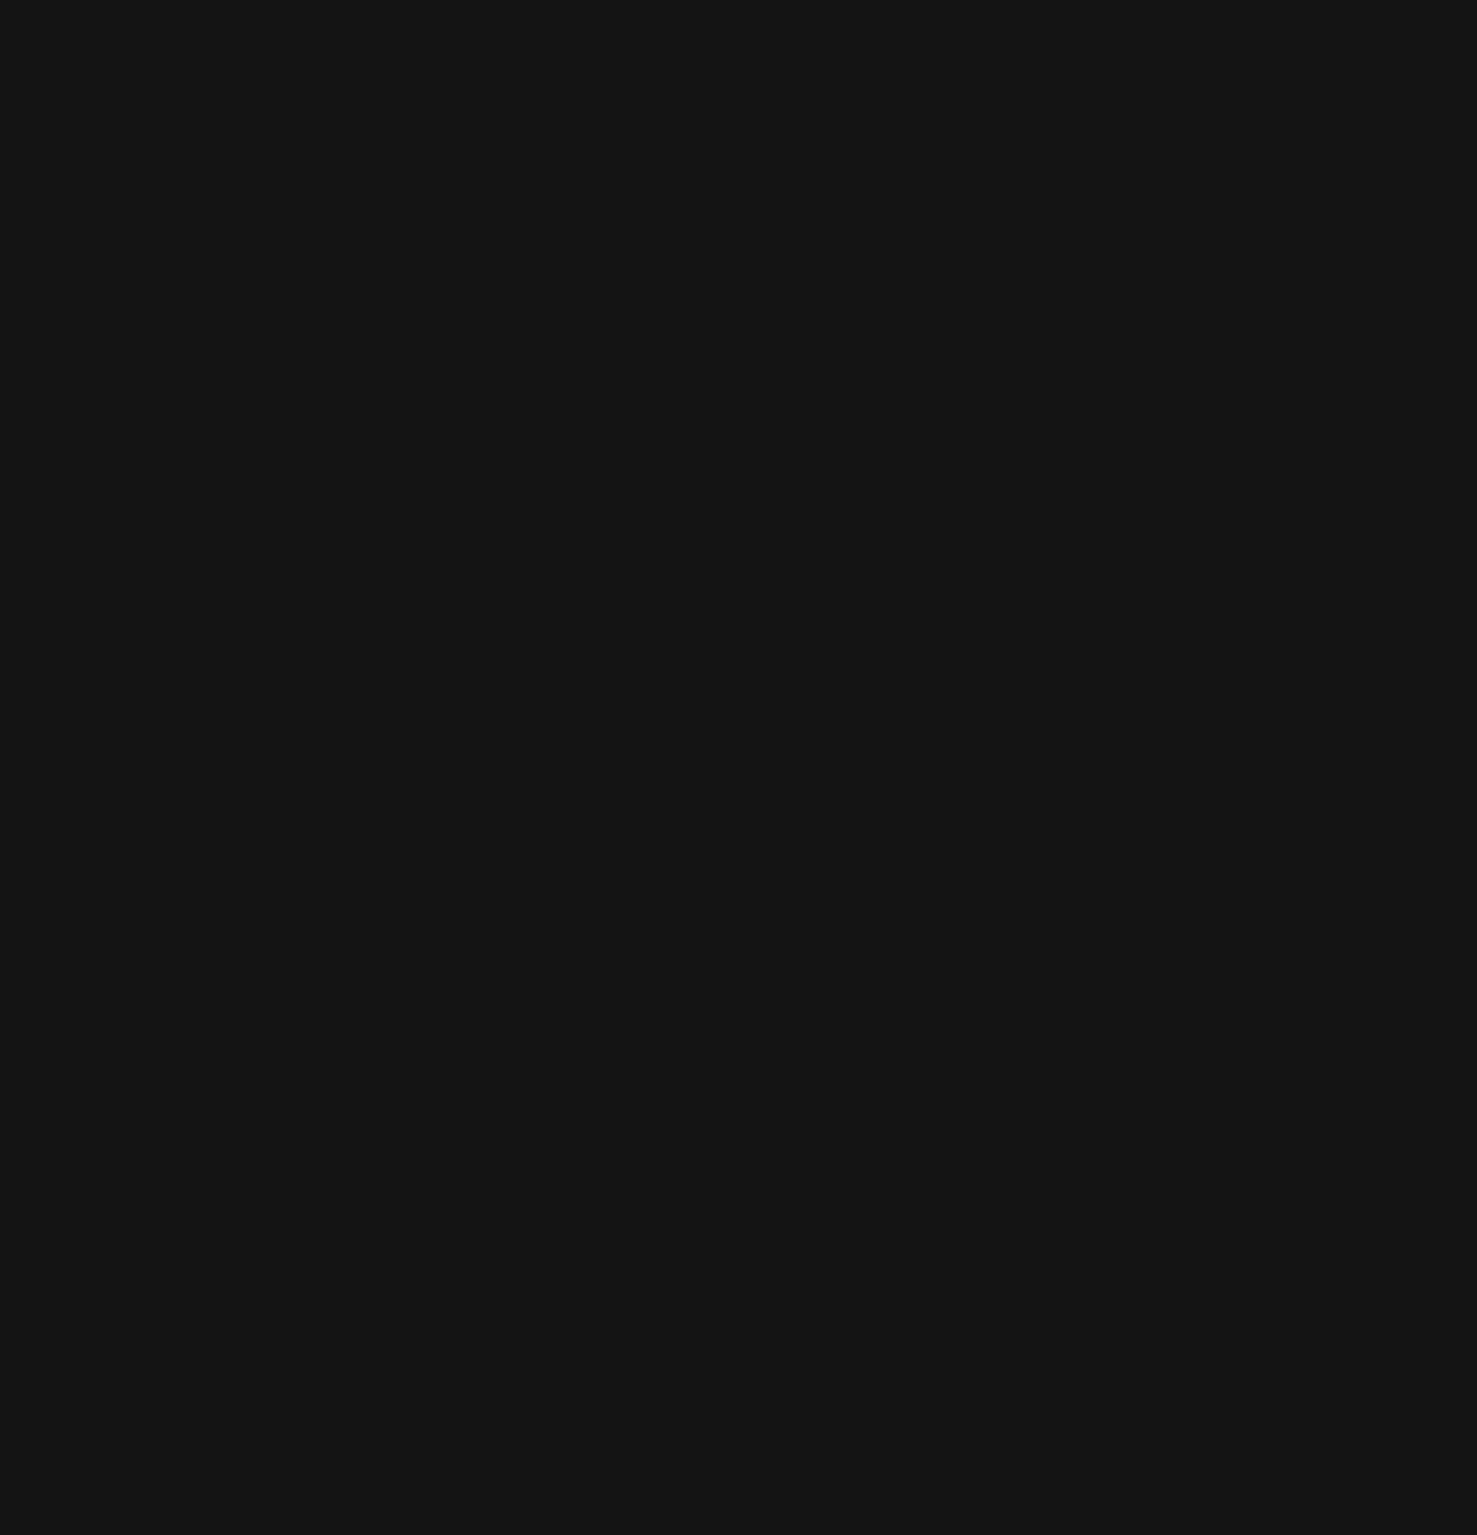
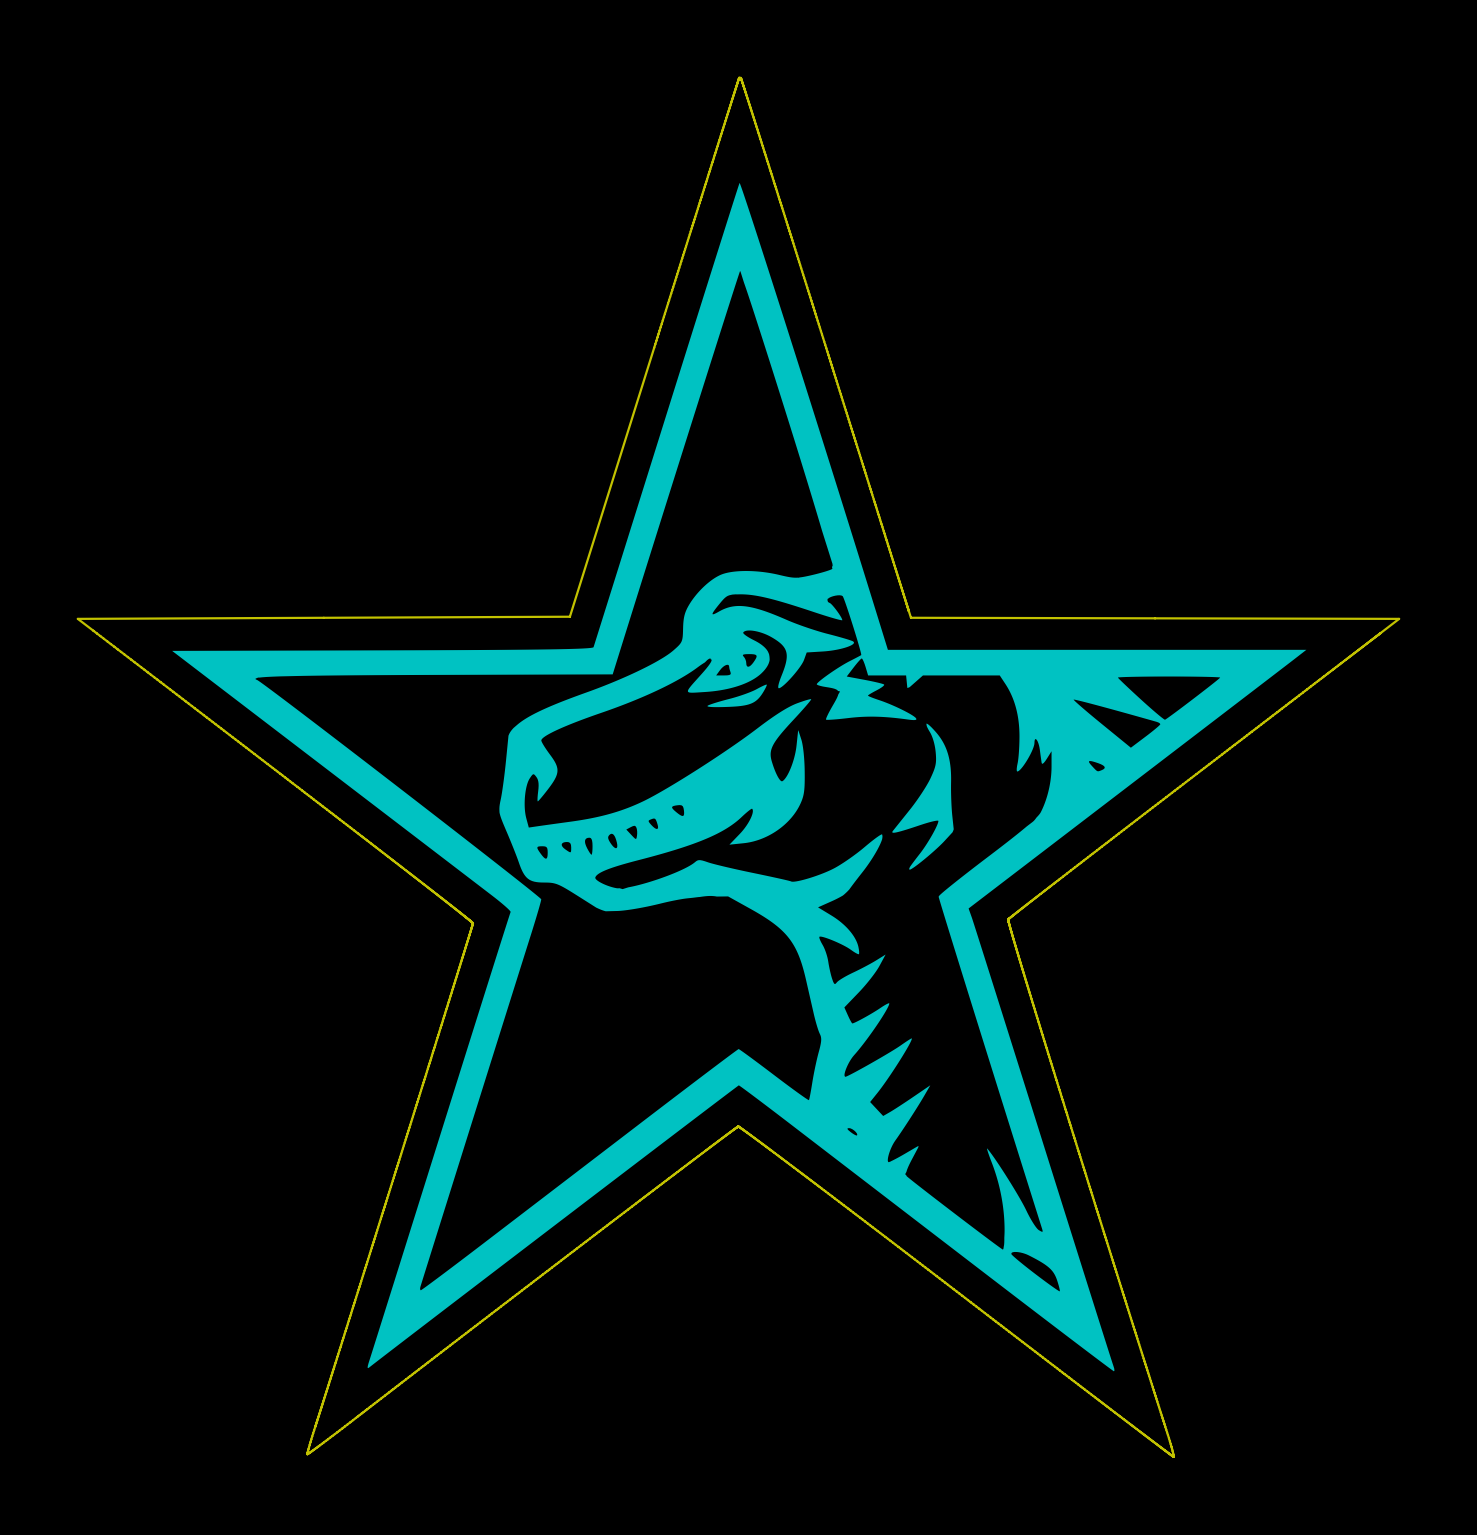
drawing: none -> [76, 76, 1401, 1458]

